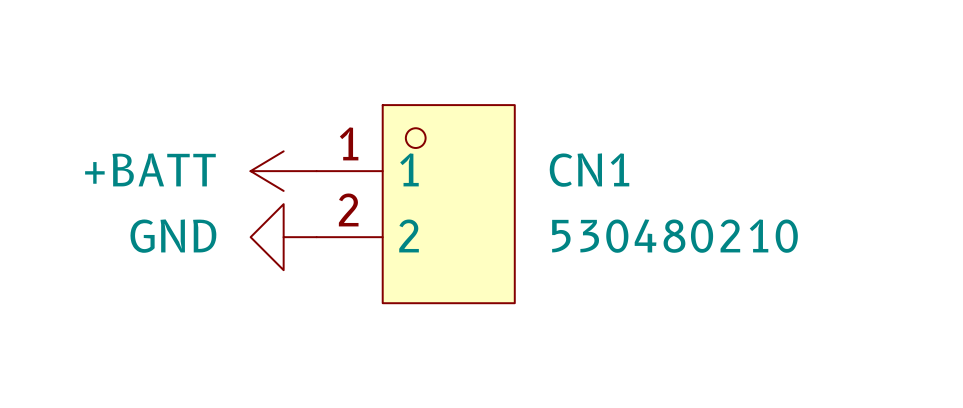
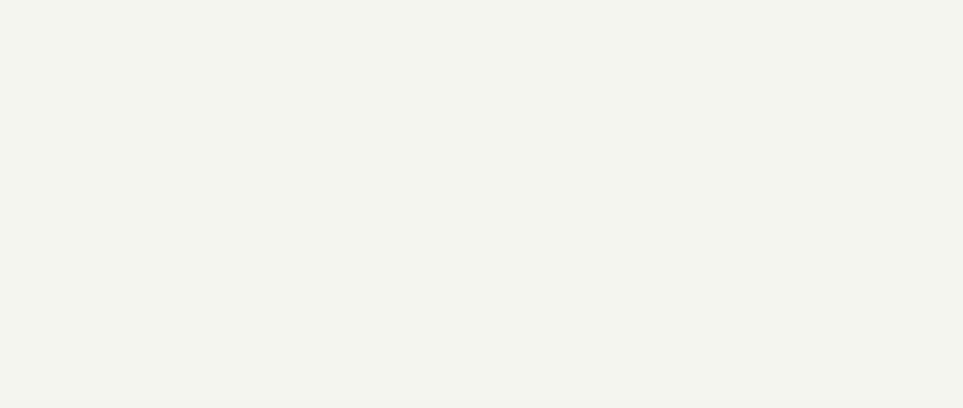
power symbol: +BATT (283, 171) -> none
CN1: 530480210 (415, 204) -> none
power symbol: GND (283, 237) -> none

